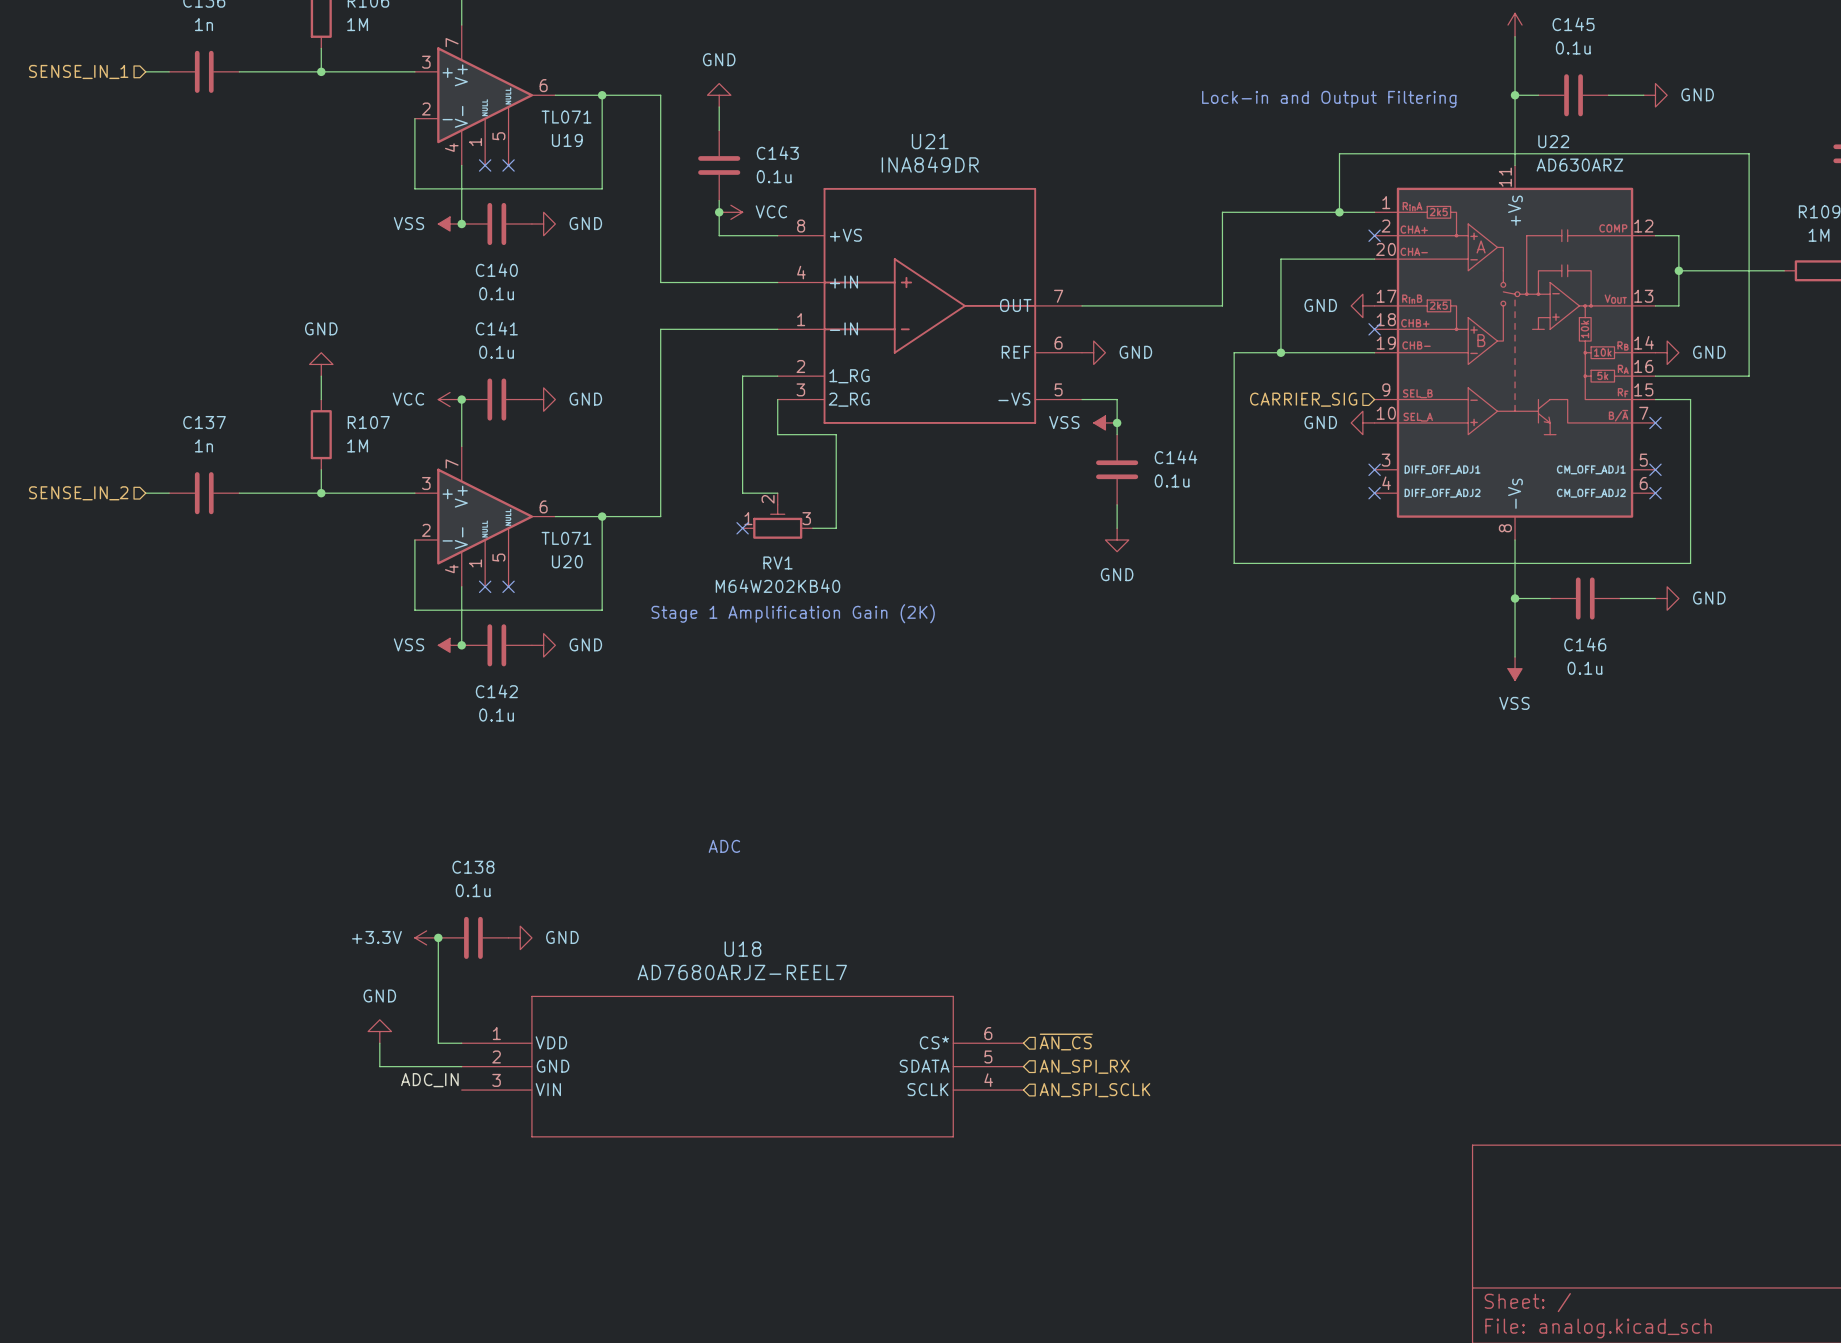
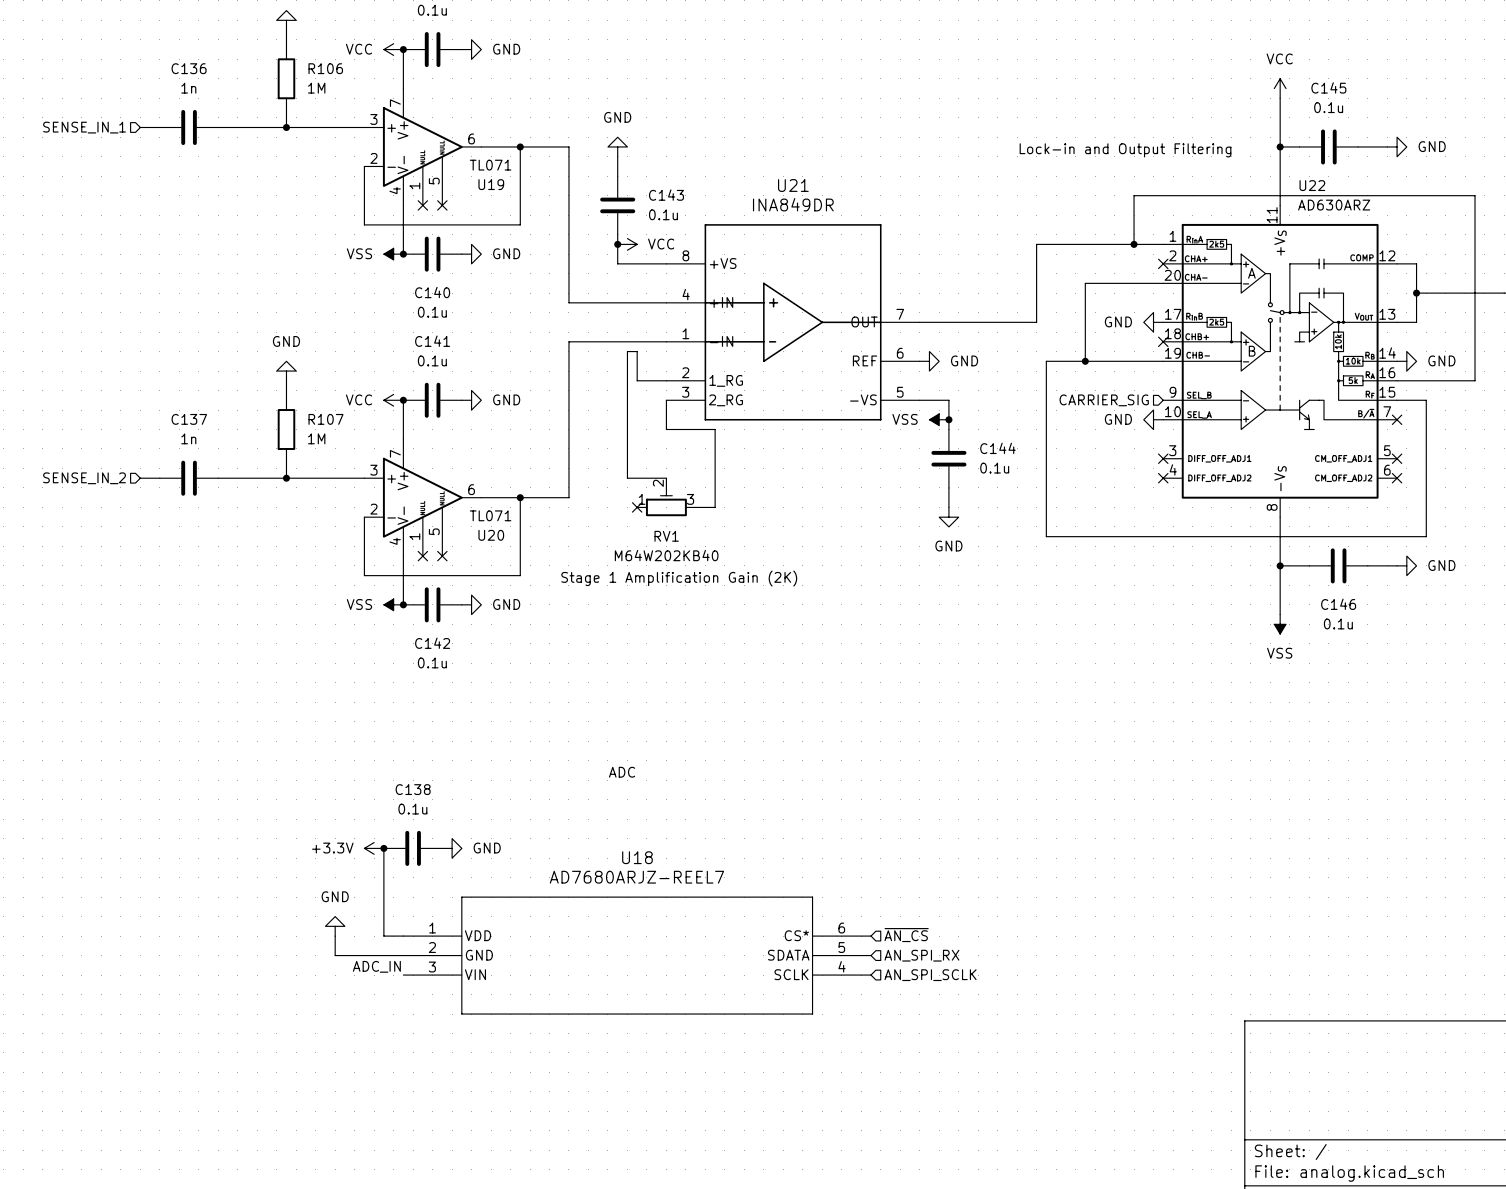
wire: (742, 376) (742, 493) -> (637, 380) (637, 351) (627, 351) (627, 478) (637, 478)

